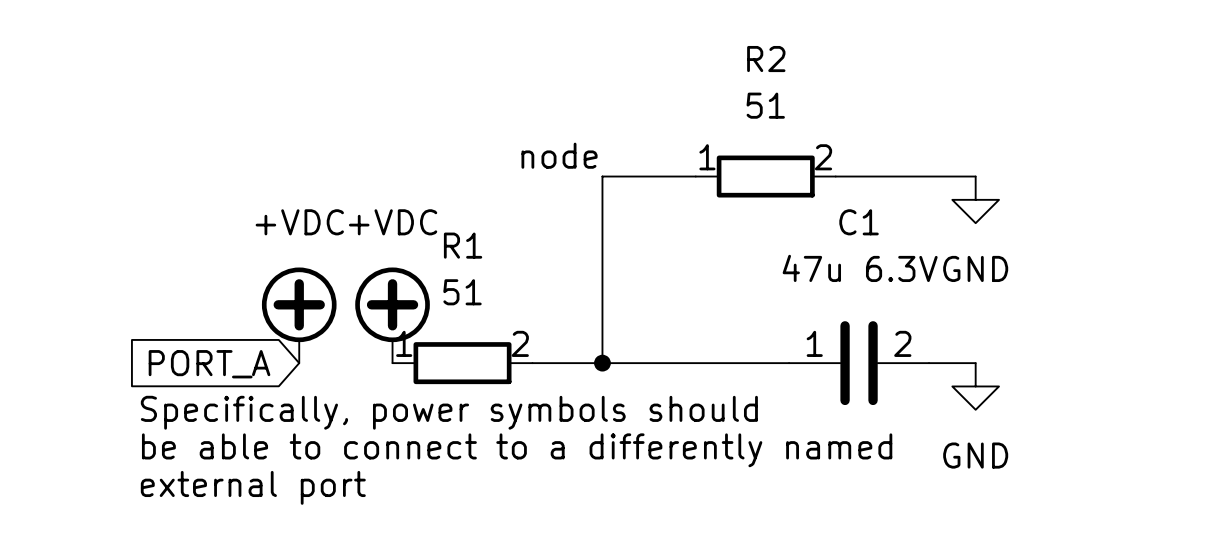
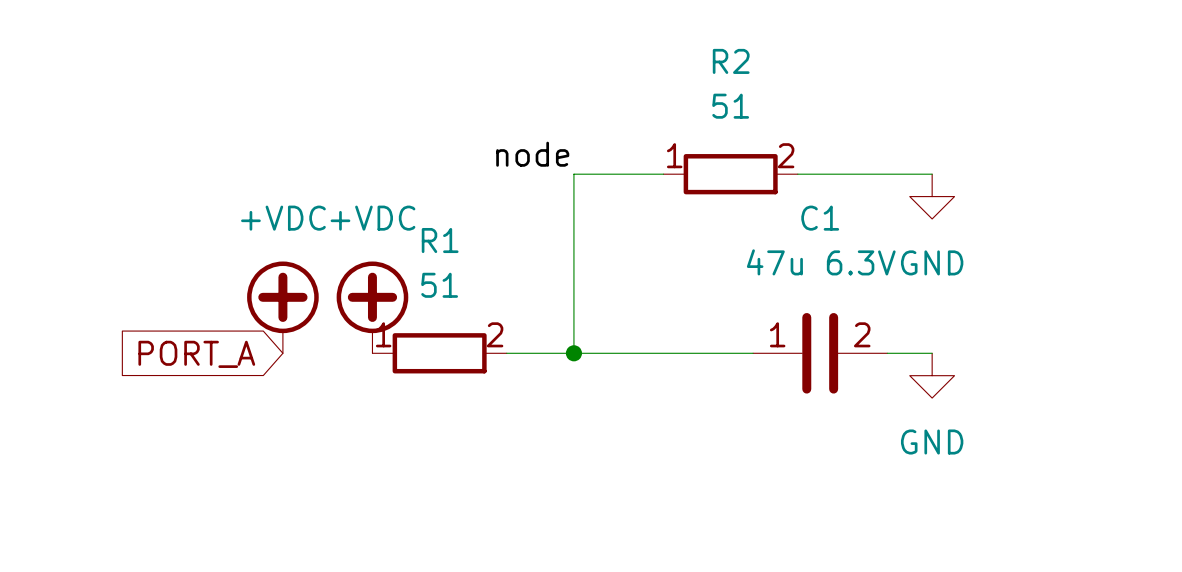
text: Specifically, power symbols should (449, 412) -> none
text: be able to connect to a differently named (517, 450) -> none
text: external port (253, 487) -> none

